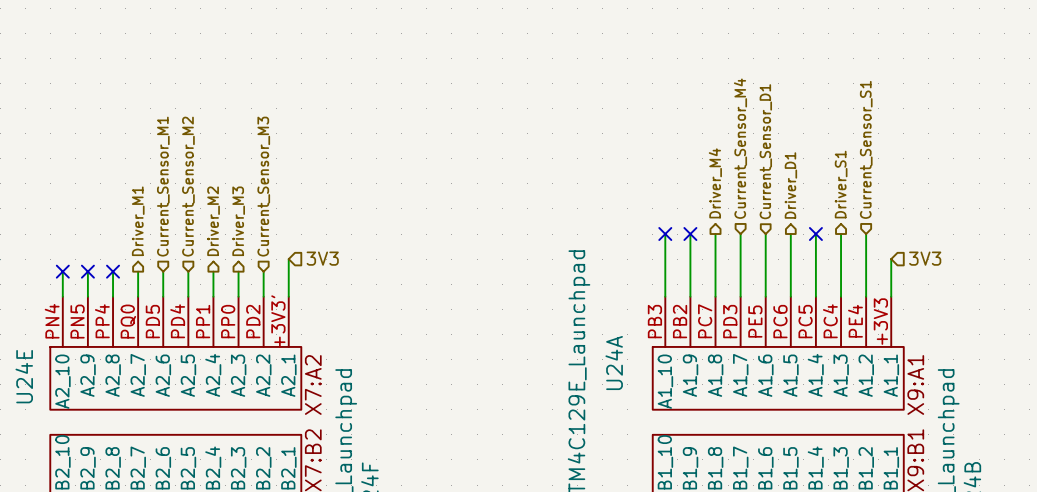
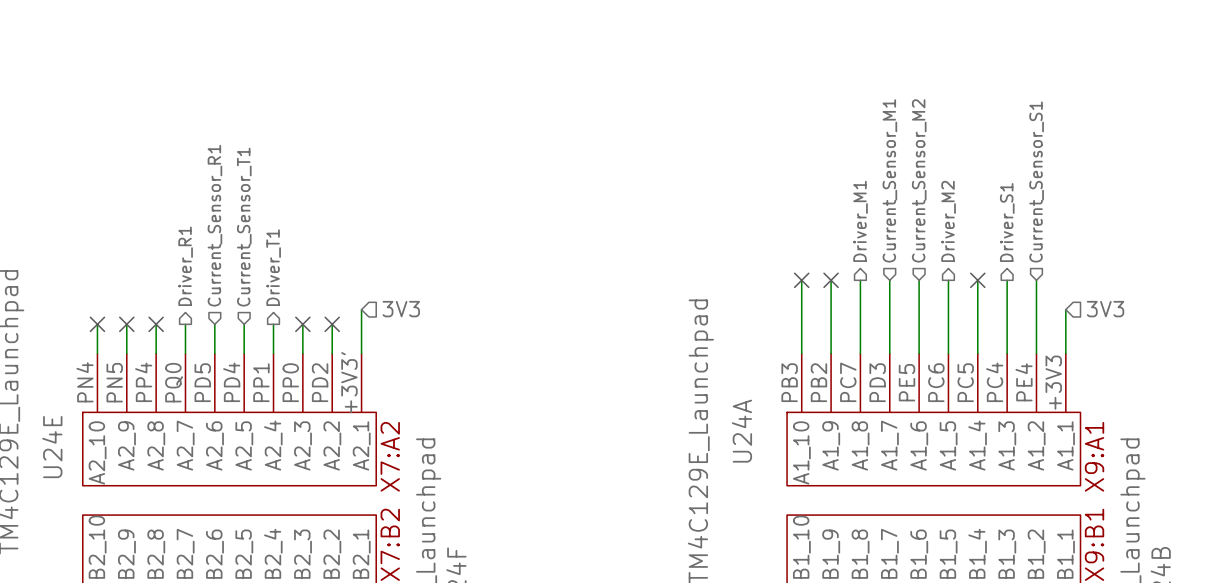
hierarchical label: Current_Sensor_M4 (740, 148) -> Current_Sensor_M1 (889, 180)
hierarchical label: Current_Sensor_D1 (765, 151) -> Current_Sensor_M2 (919, 180)
hierarchical label: Driver_M4 (715, 183) -> Driver_M1 (860, 221)
hierarchical label: Driver_D1 (790, 185) -> Driver_M2 (948, 221)
hierarchical label: Current_Sensor_M1 (163, 186) -> Current_Sensor_R1 (214, 225)
hierarchical label: Current_Sensor_M2 (188, 186) -> Current_Sensor_T1 (244, 227)
hierarchical label: Current_Sensor_M3 (263, 186) -> none
hierarchical label: Driver_M1 (138, 221) -> Driver_R1 (185, 266)
hierarchical label: Driver_M2 (213, 221) -> Driver_T1 (273, 267)
hierarchical label: Driver_M3 (238, 221) -> none
no-connect mark: none -> (302, 324)
no-connect mark: none -> (332, 324)

